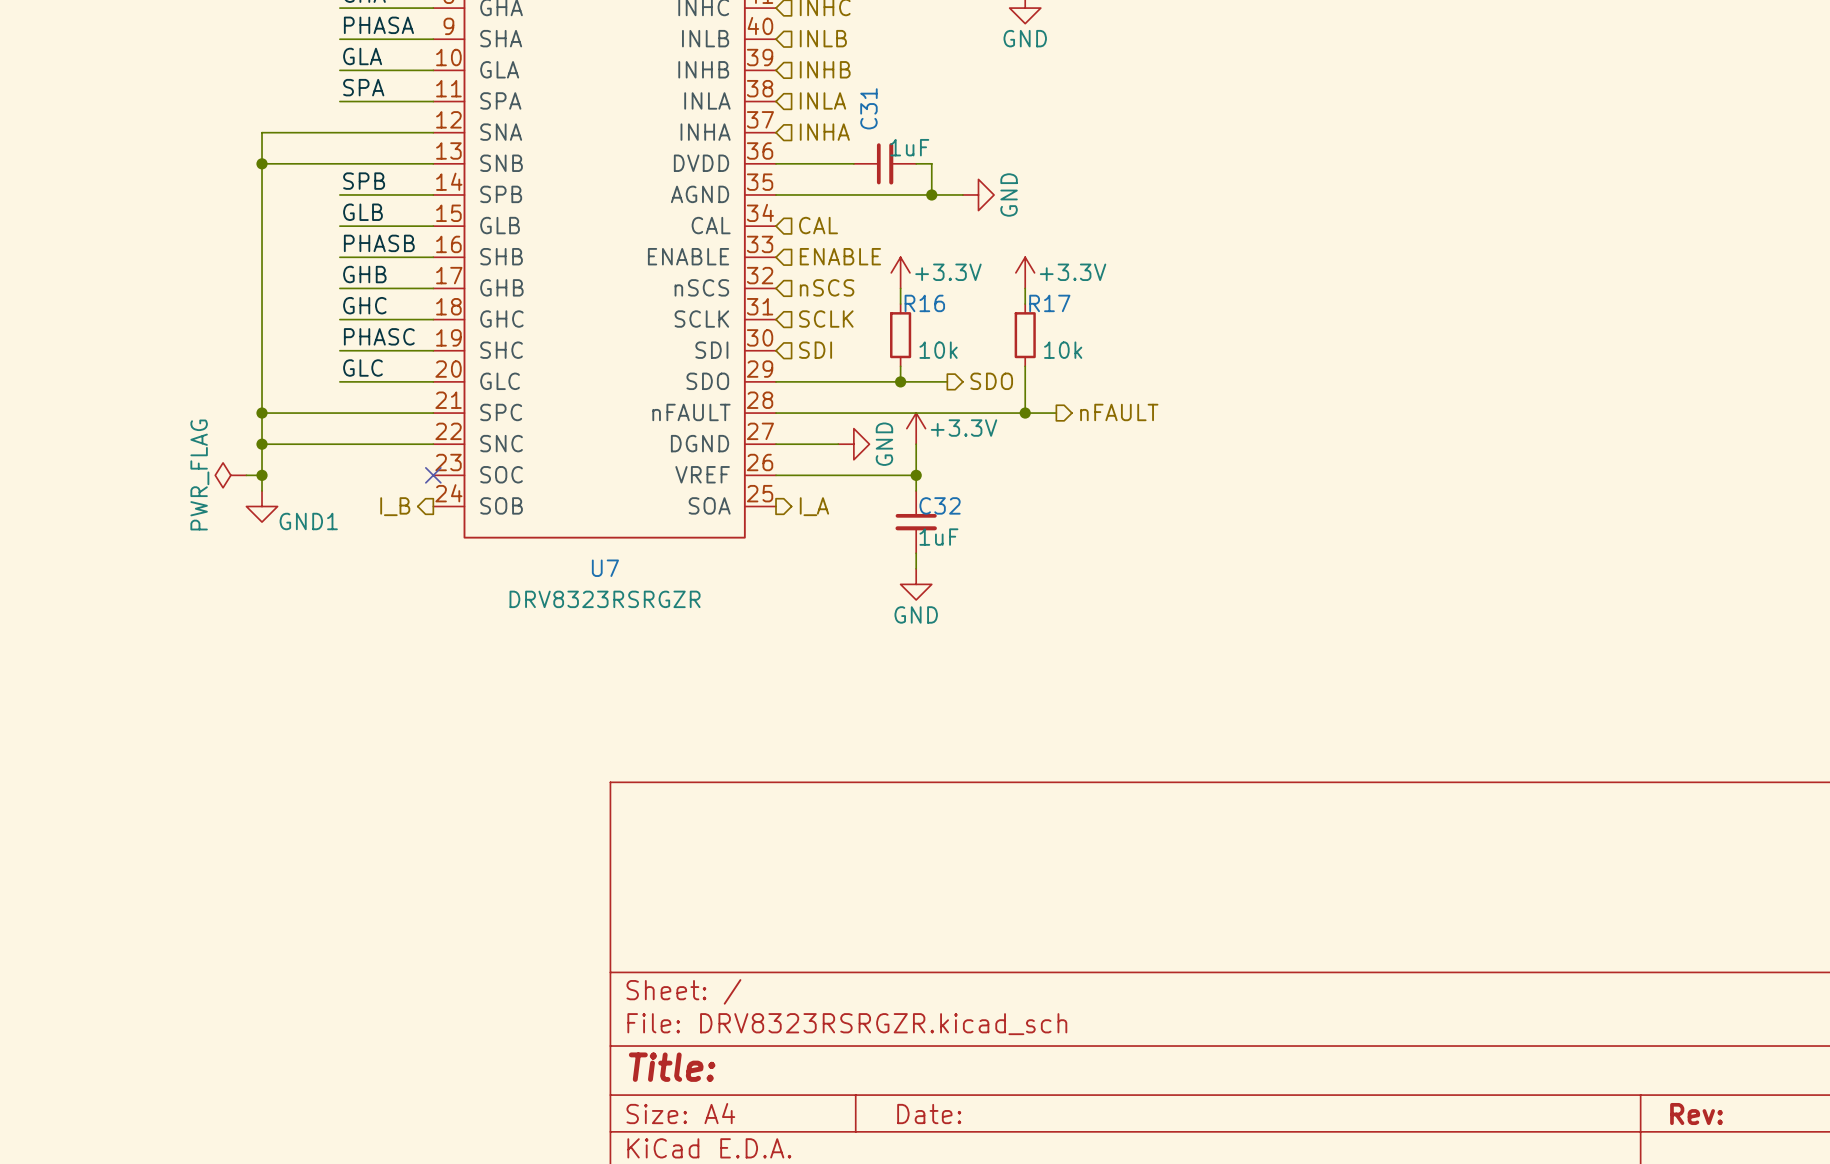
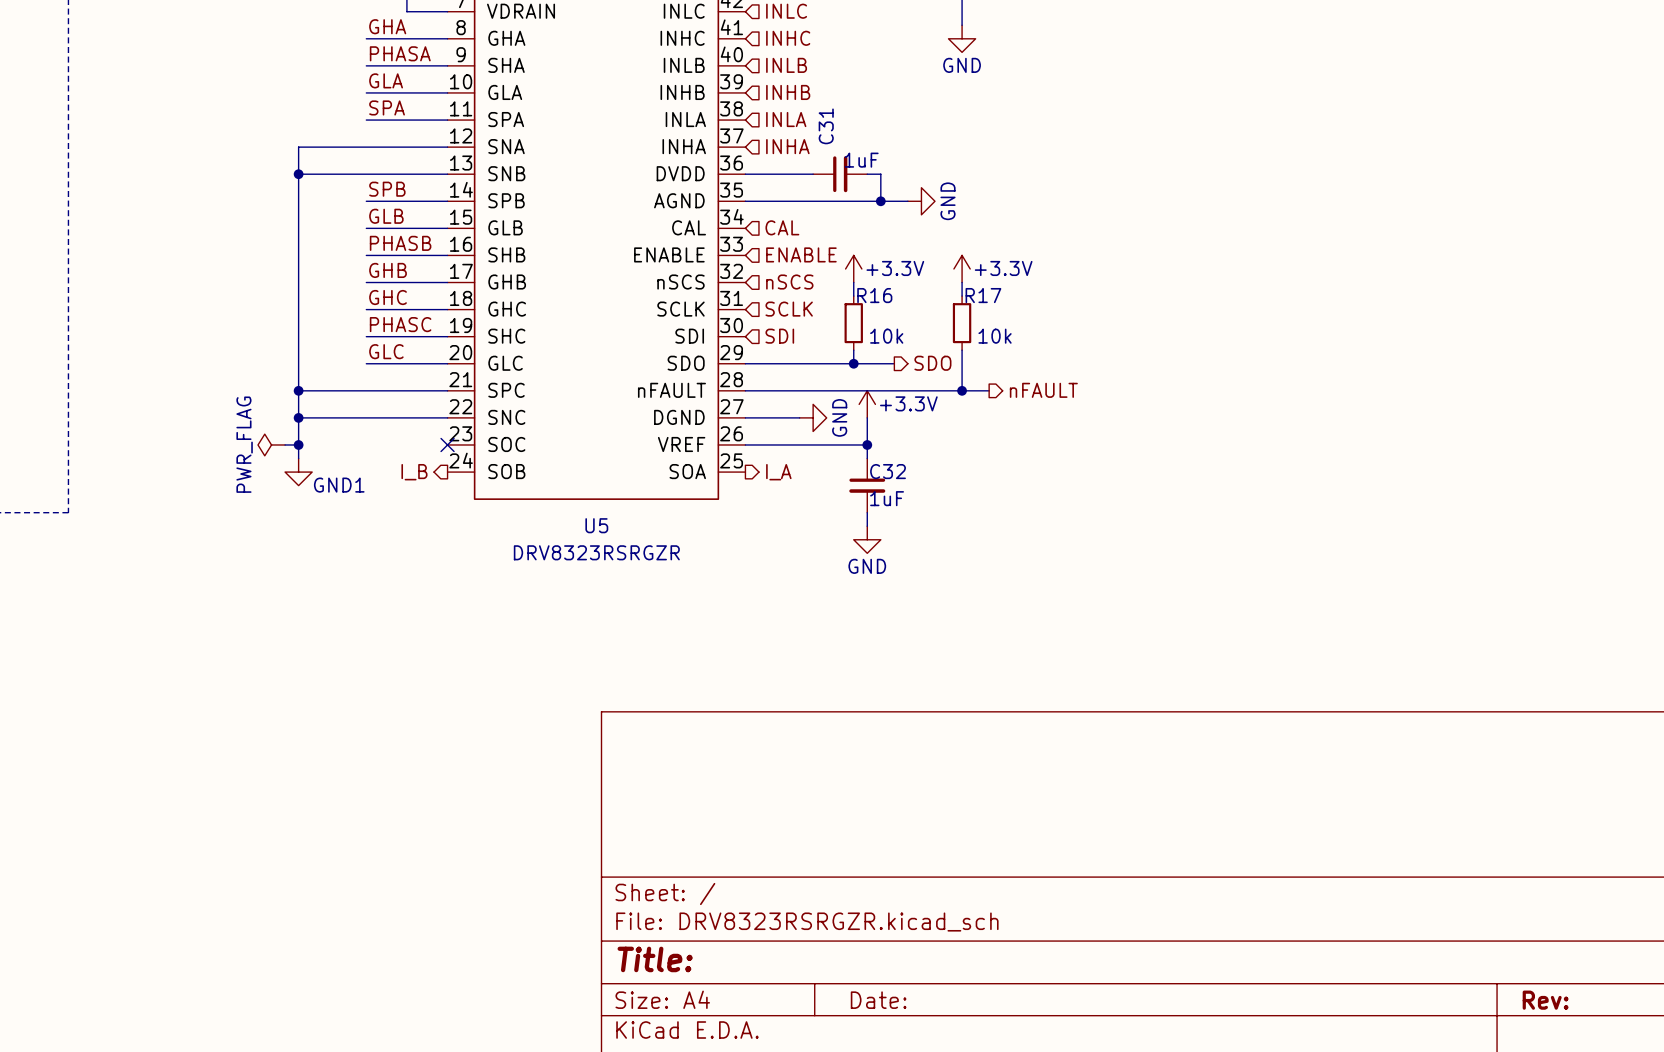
U7 name: U7 (605, 568) -> U5 (596, 525)

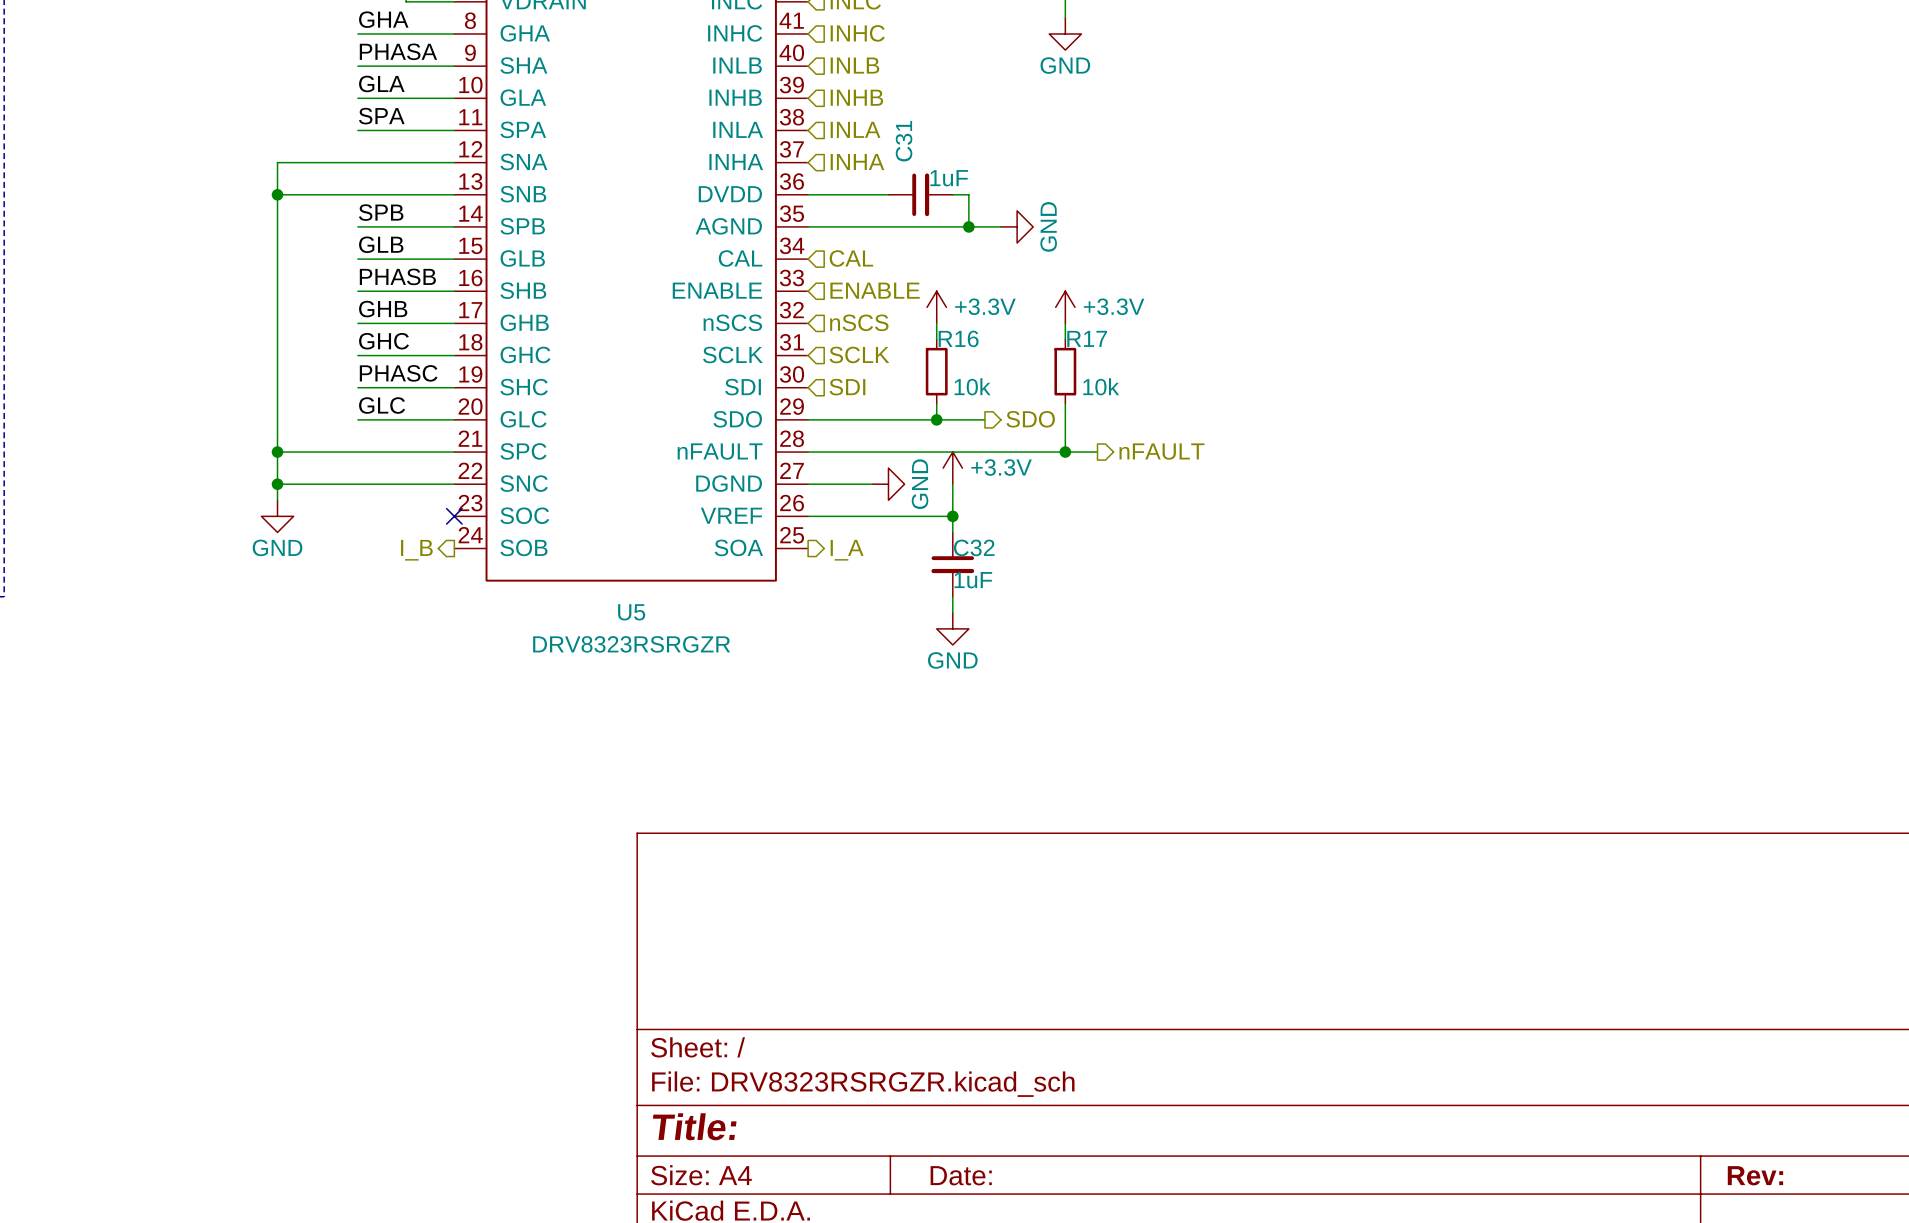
power symbol: PWR_FLAG (271, 444) -> none
junction: (298, 444) -> none
power symbol: none -> GND (277, 516)
power symbol: GND1 (298, 472) -> none

